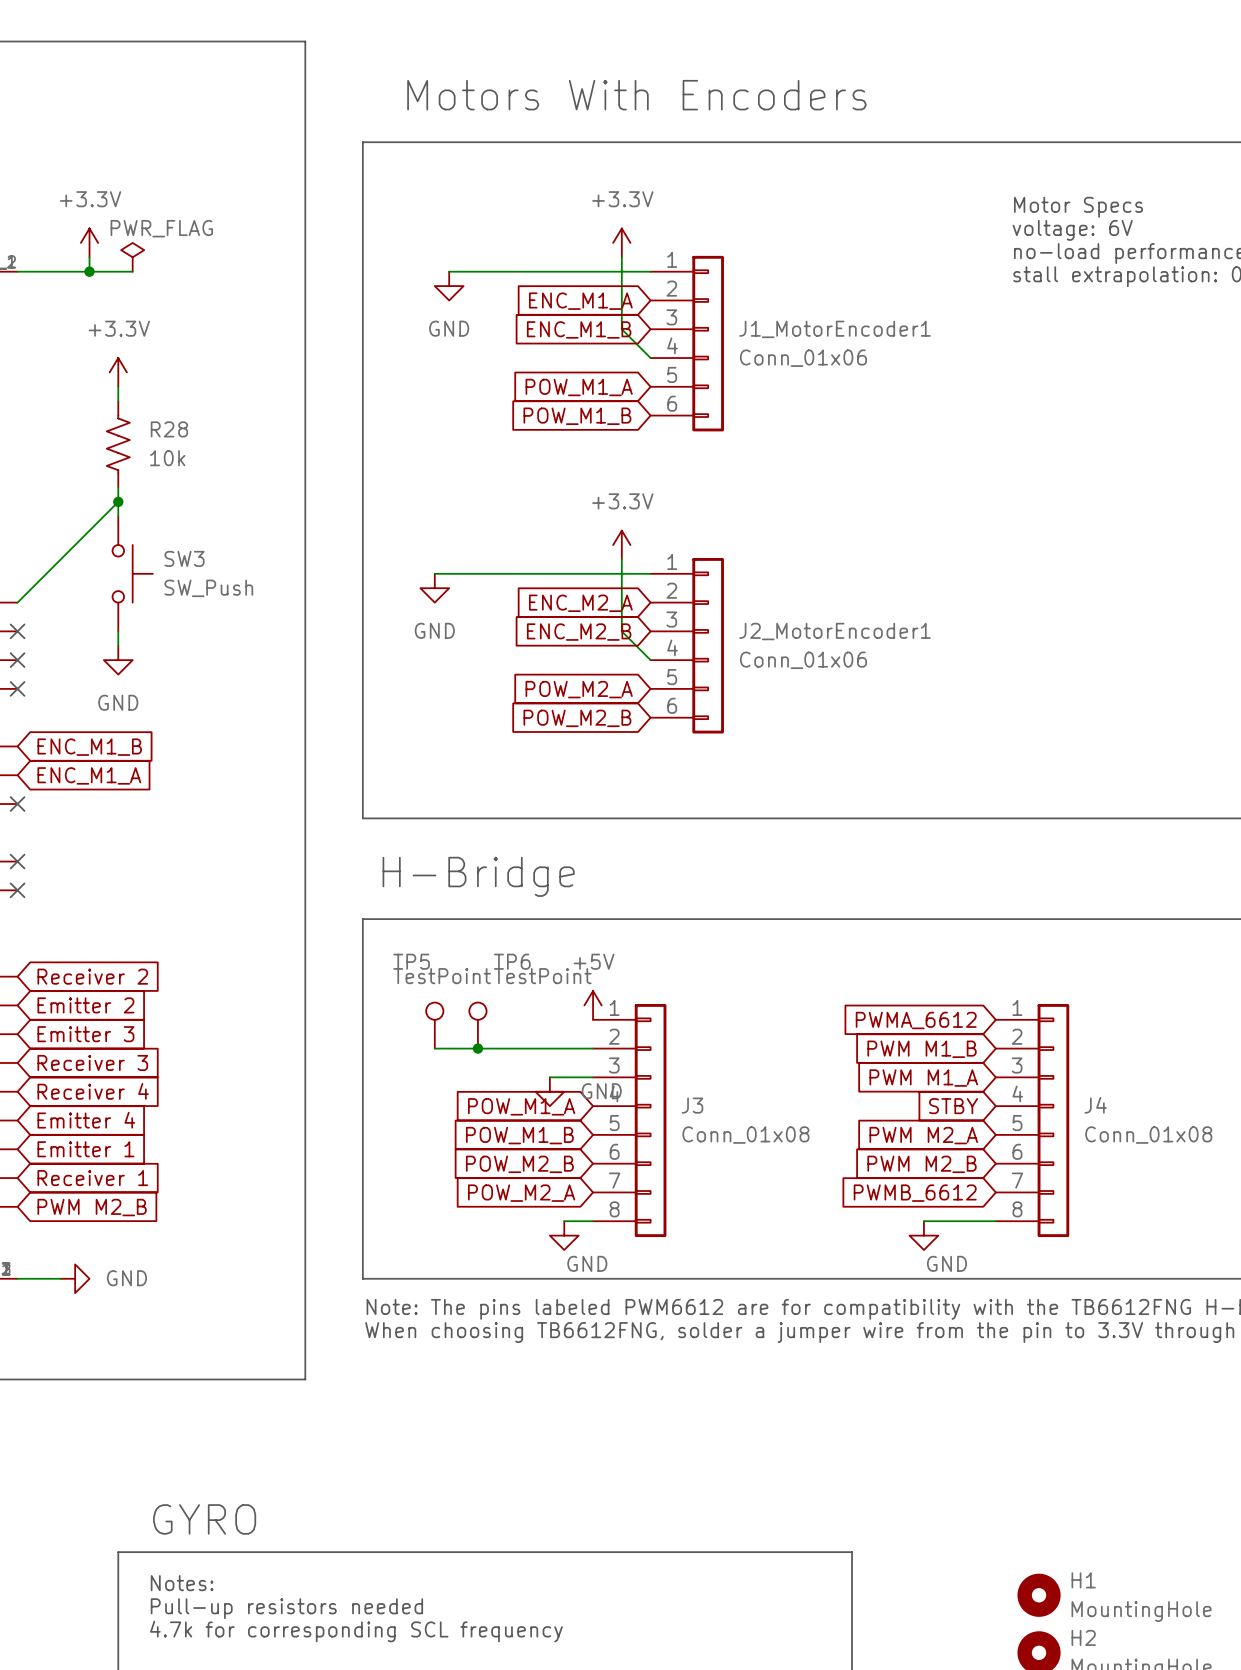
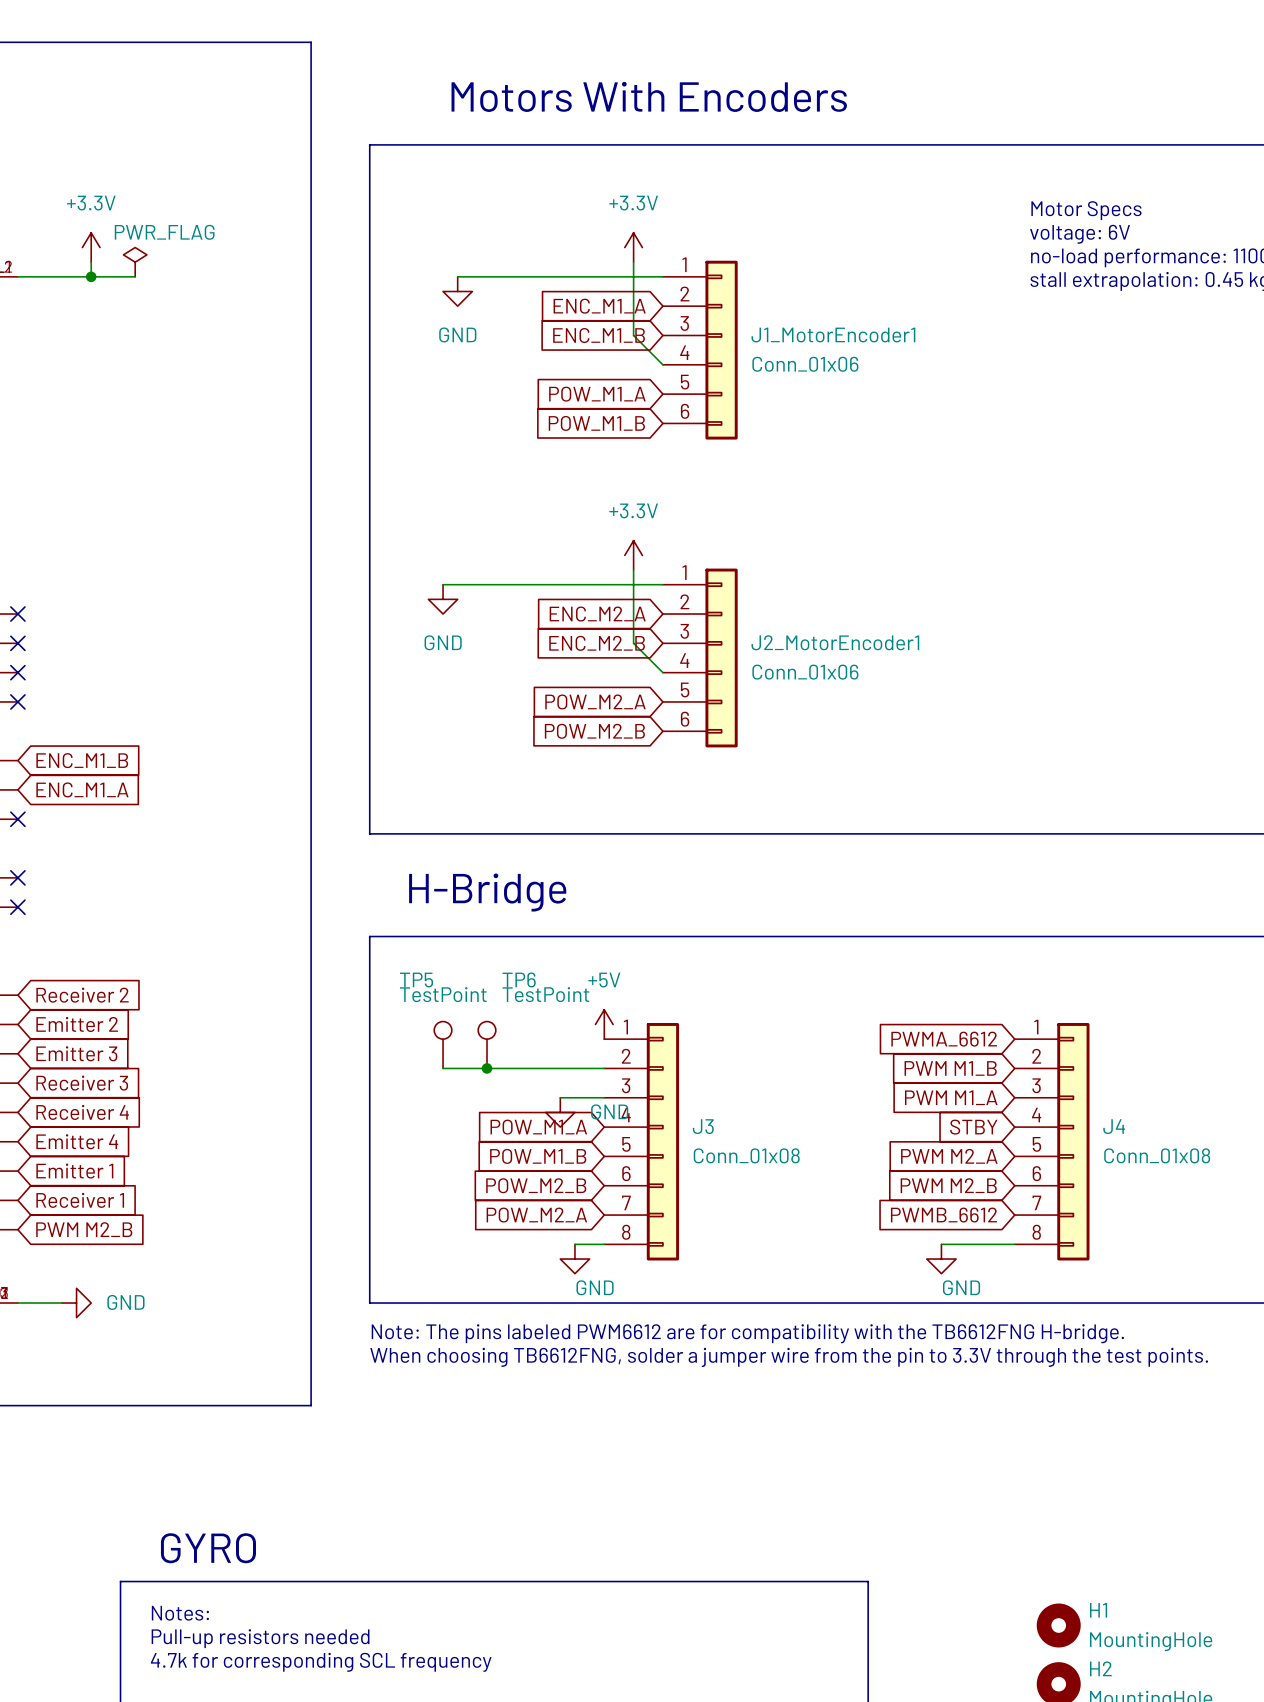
power symbol: +3.3V (118, 372) -> none
wire: (118, 386) (118, 401) -> none
R28: 10k (118, 444) -> none
wire: (118, 487) (118, 516) -> none
wire: (118, 501) (17, 602) -> none
junction: (118, 501) -> none
SW3: SW_Push (132, 573) -> none
no-connect mark: none -> (17, 614)
wire: (118, 631) (118, 645) -> none
power symbol: GND (118, 660) -> none

